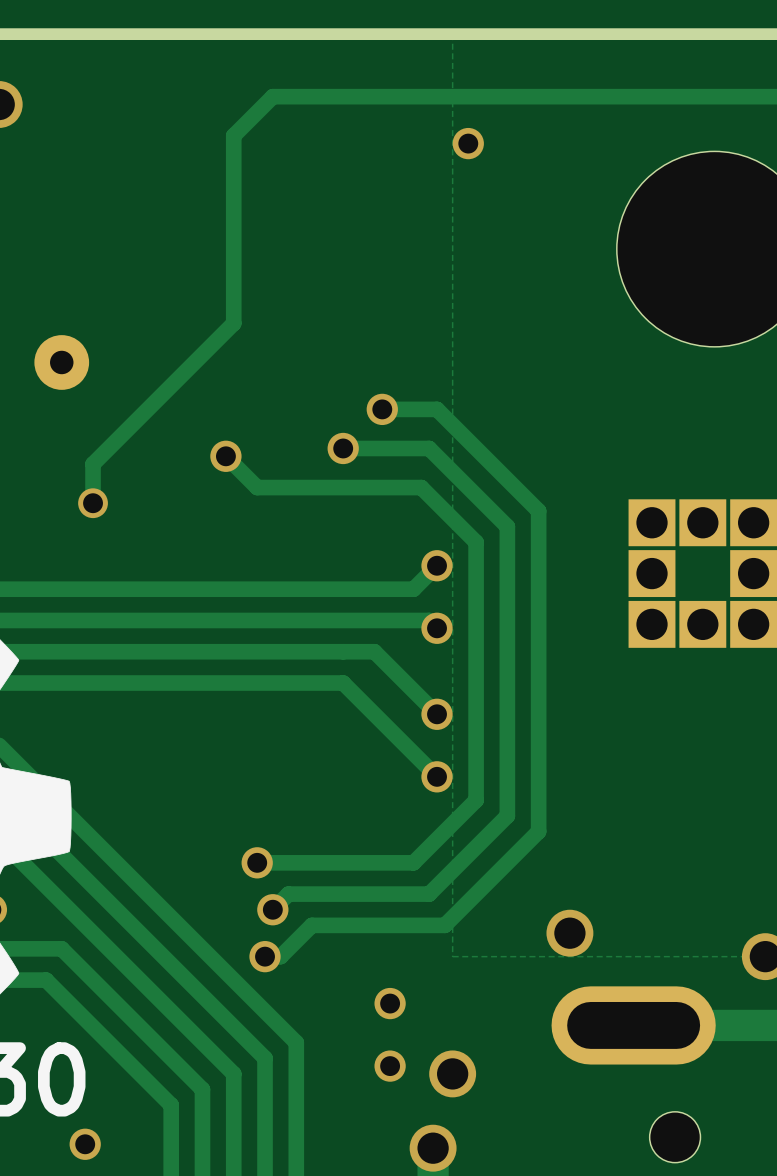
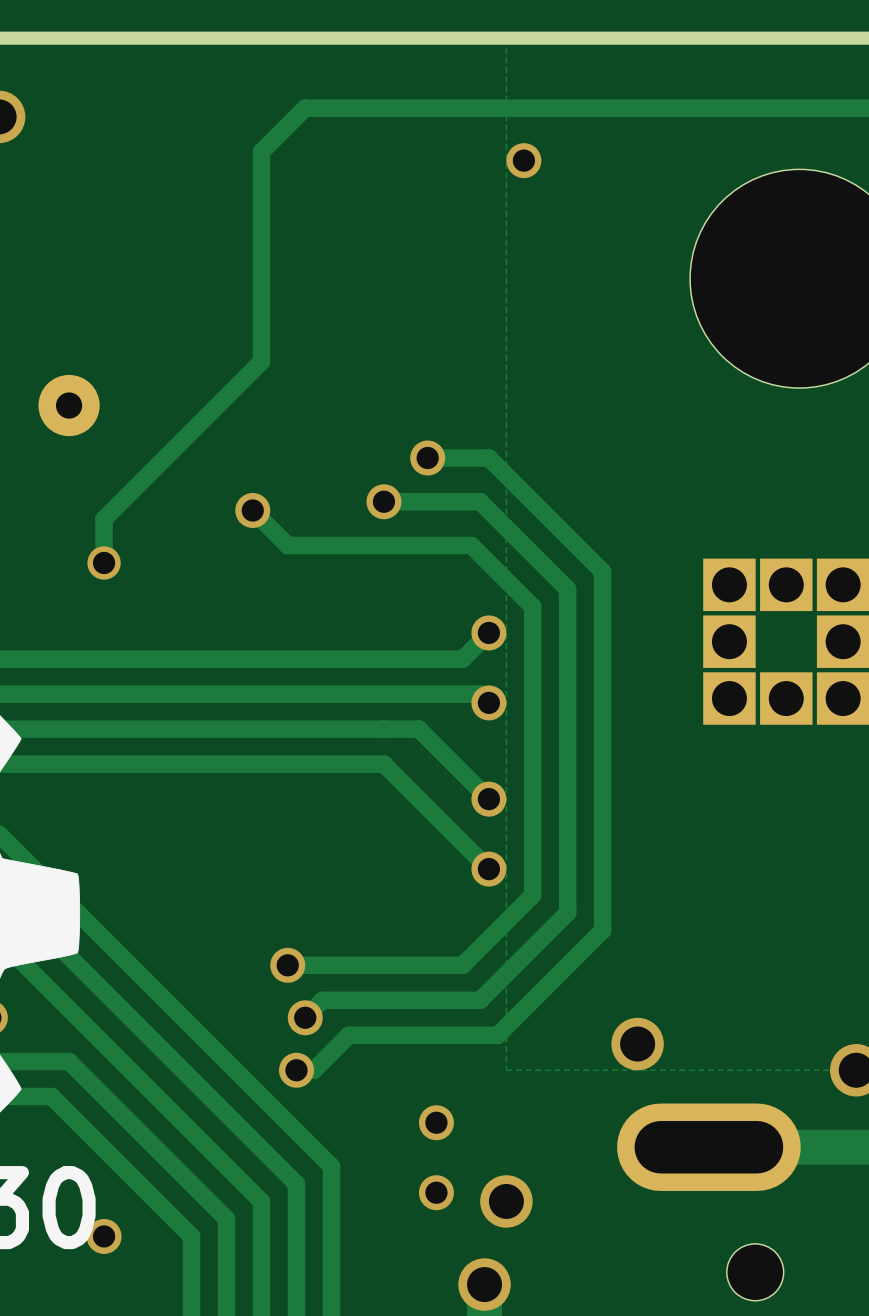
via position: (85, 1144) -> (104, 1236)

